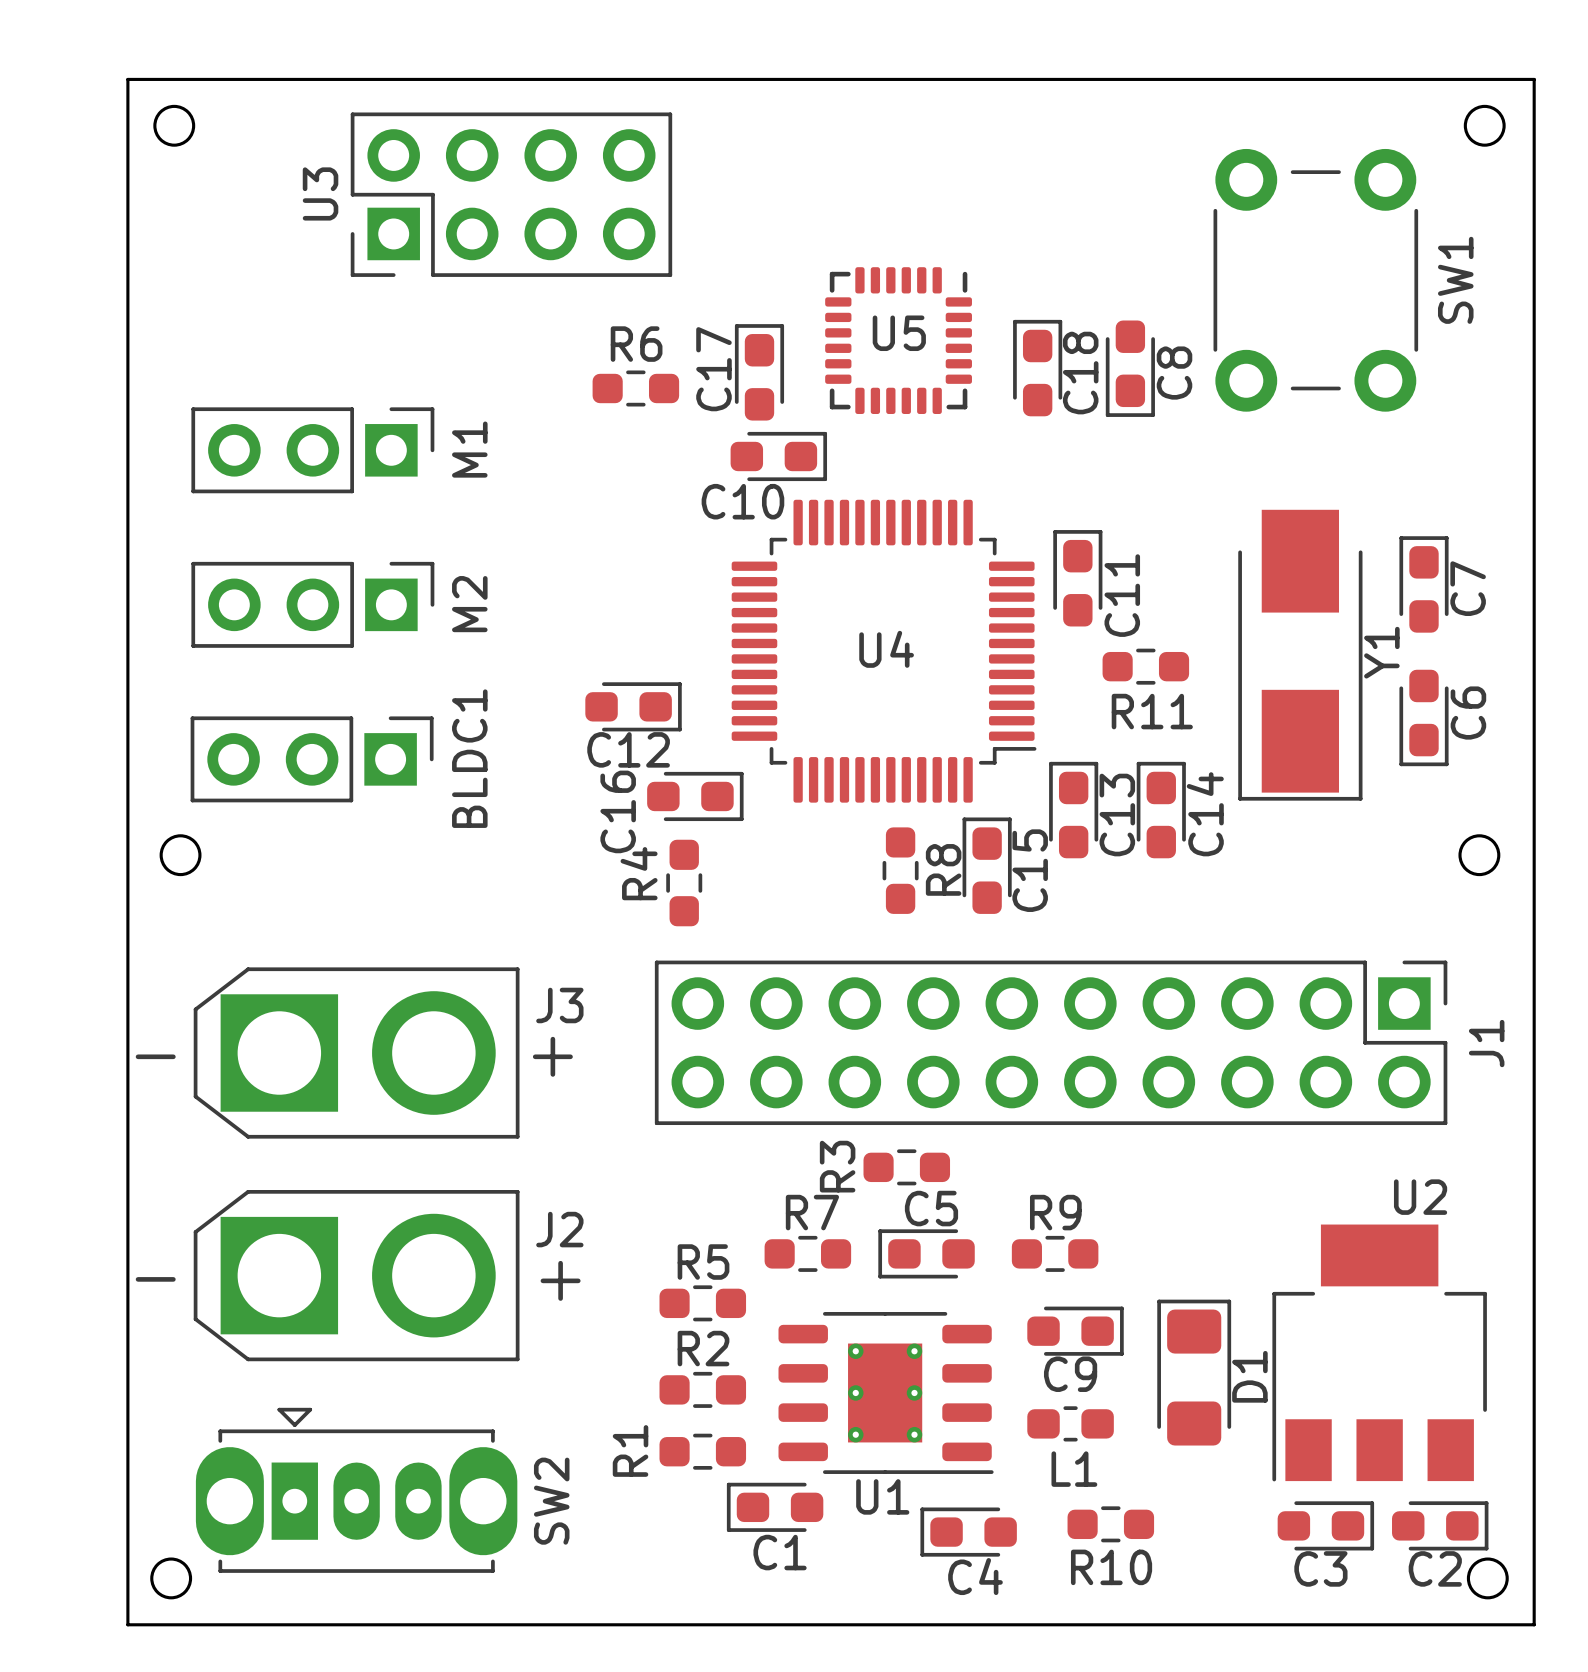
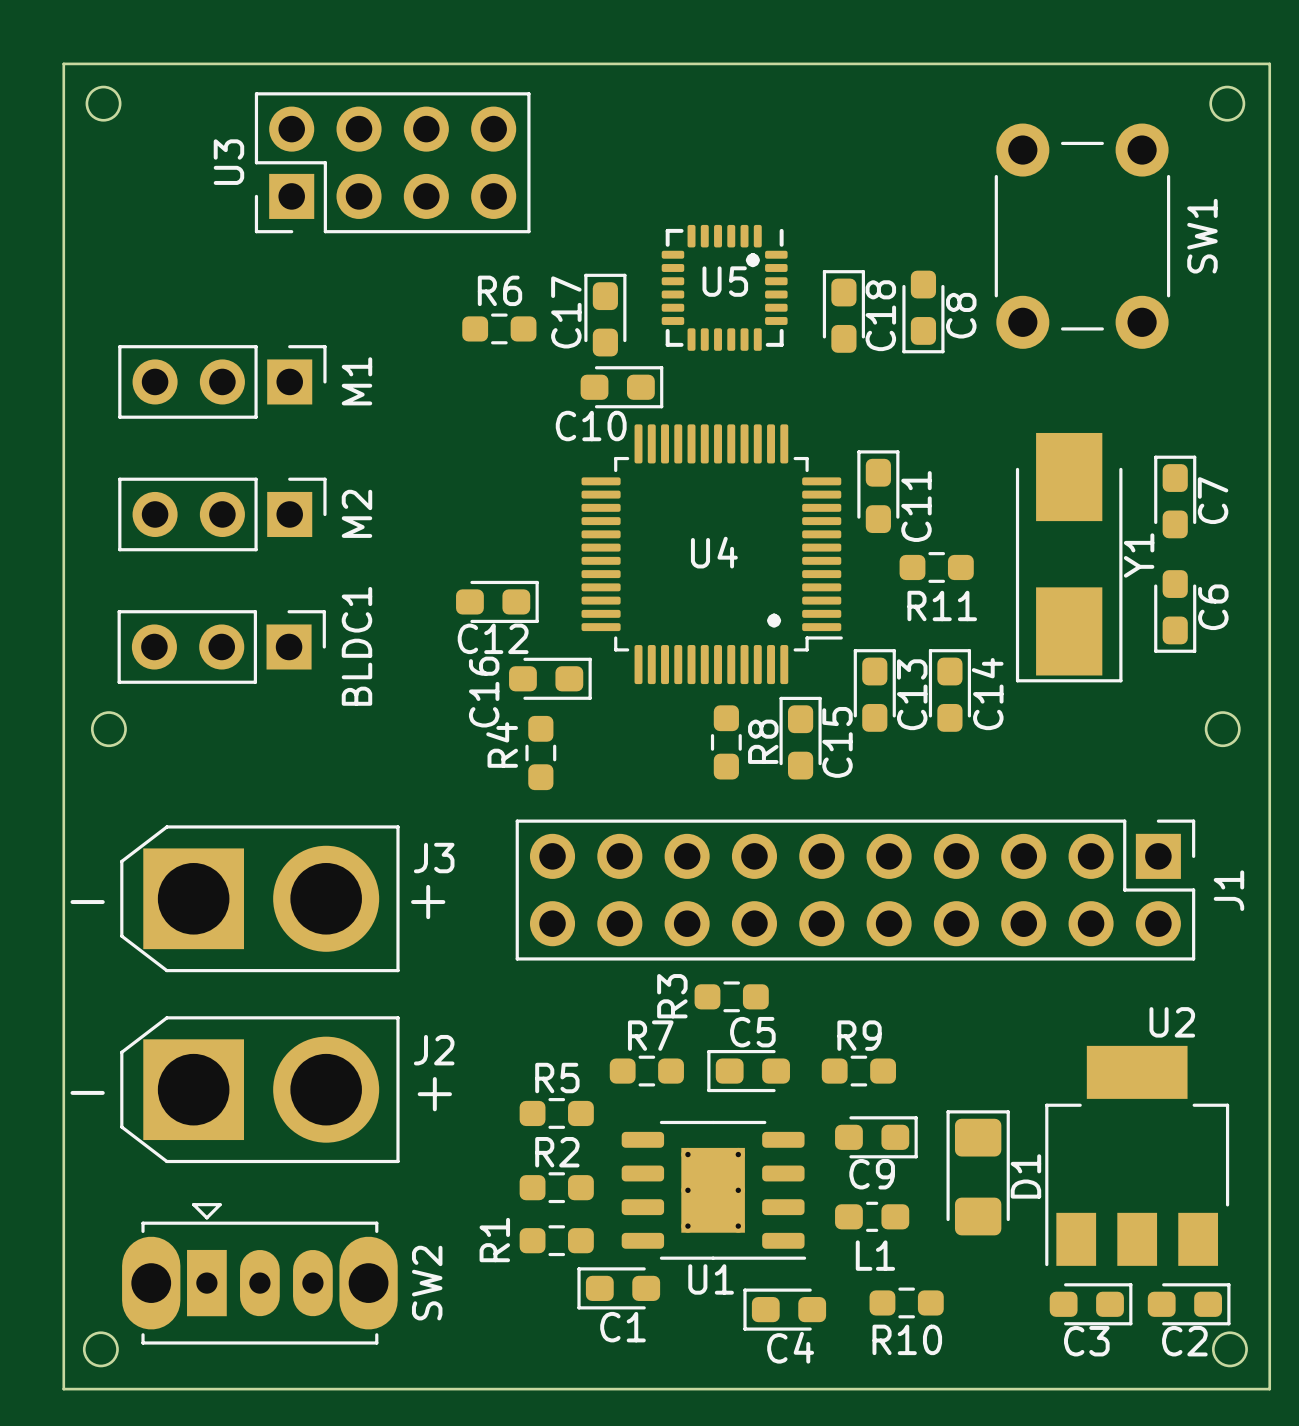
text: none -> ° (752, 260)
text: none -> ° (774, 620)

